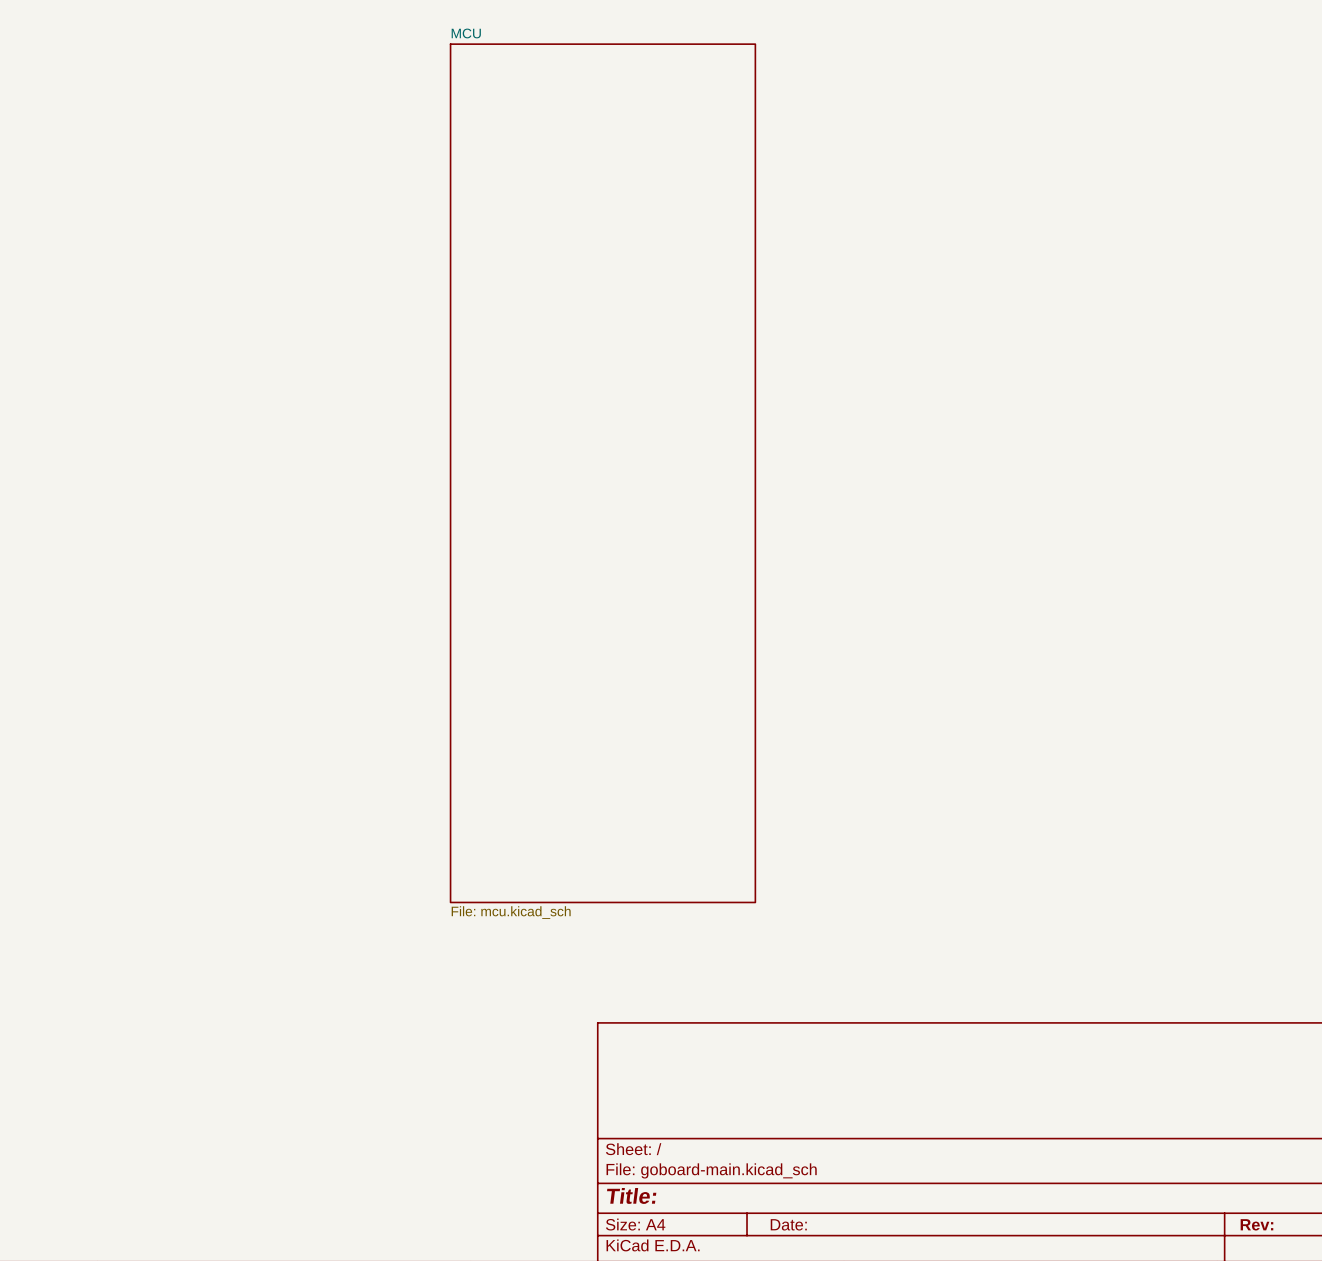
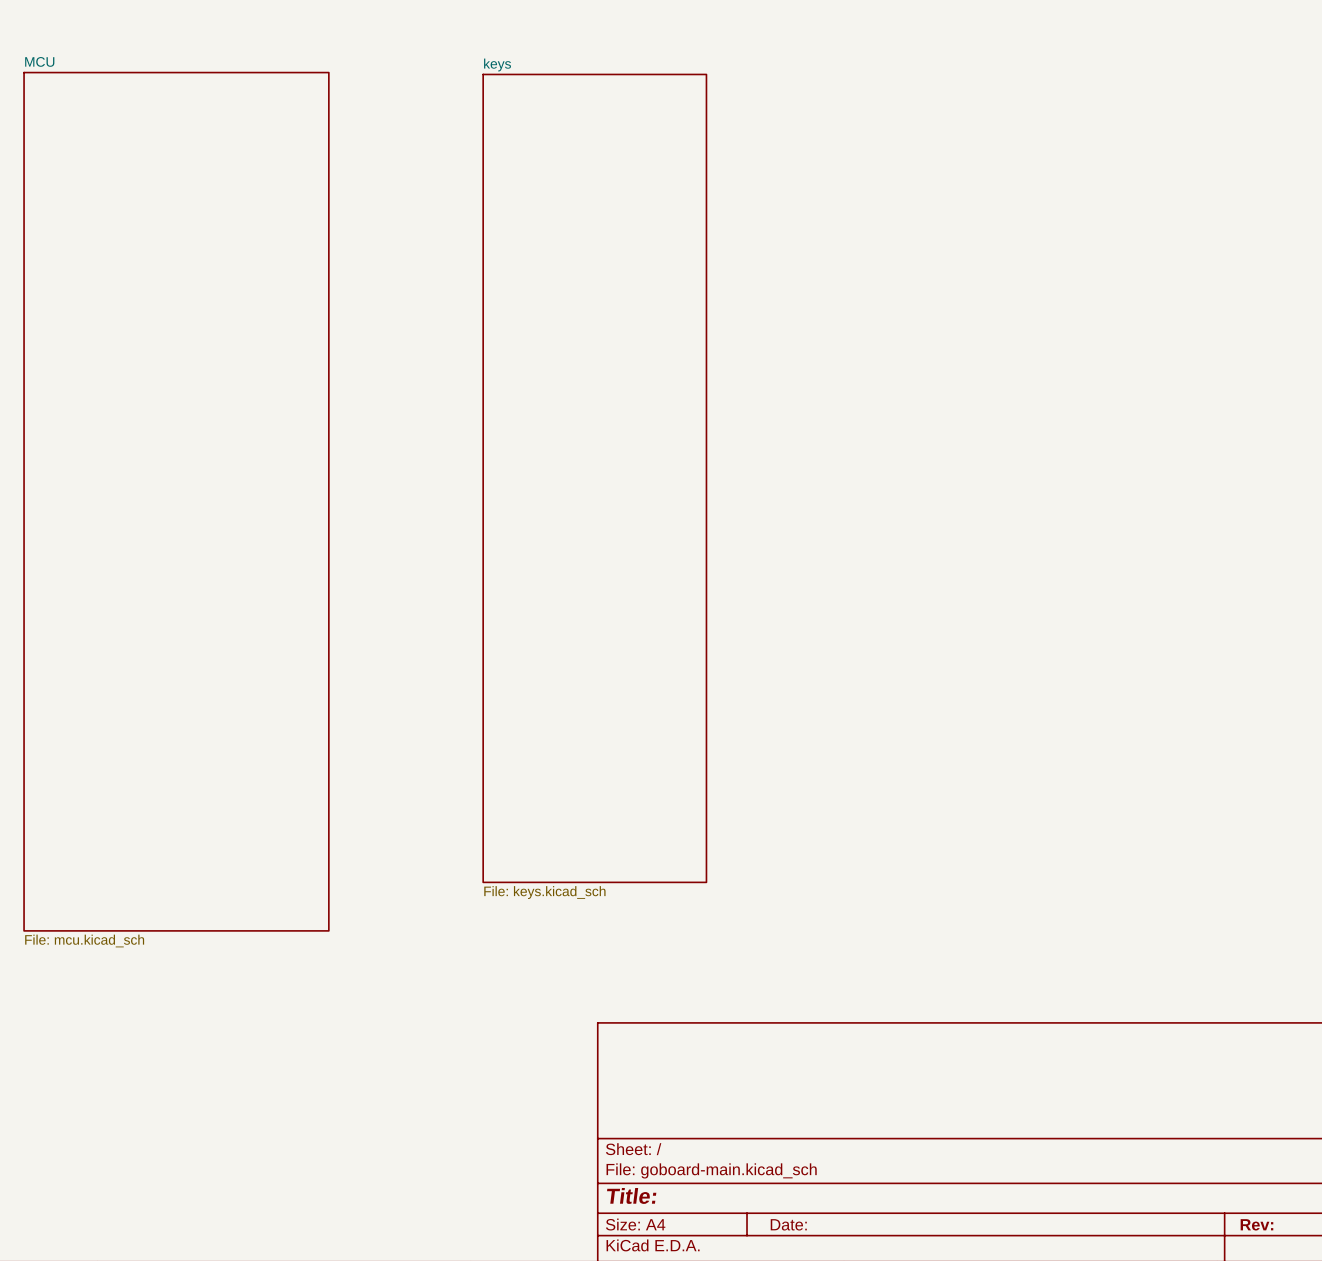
sheet MCU: File: mcu.kicad_sch (602, 473) -> none
sheet keys: none -> File: keys.kicad_sch (594, 478)
sheet MCU: none -> File: mcu.kicad_sch (176, 501)

